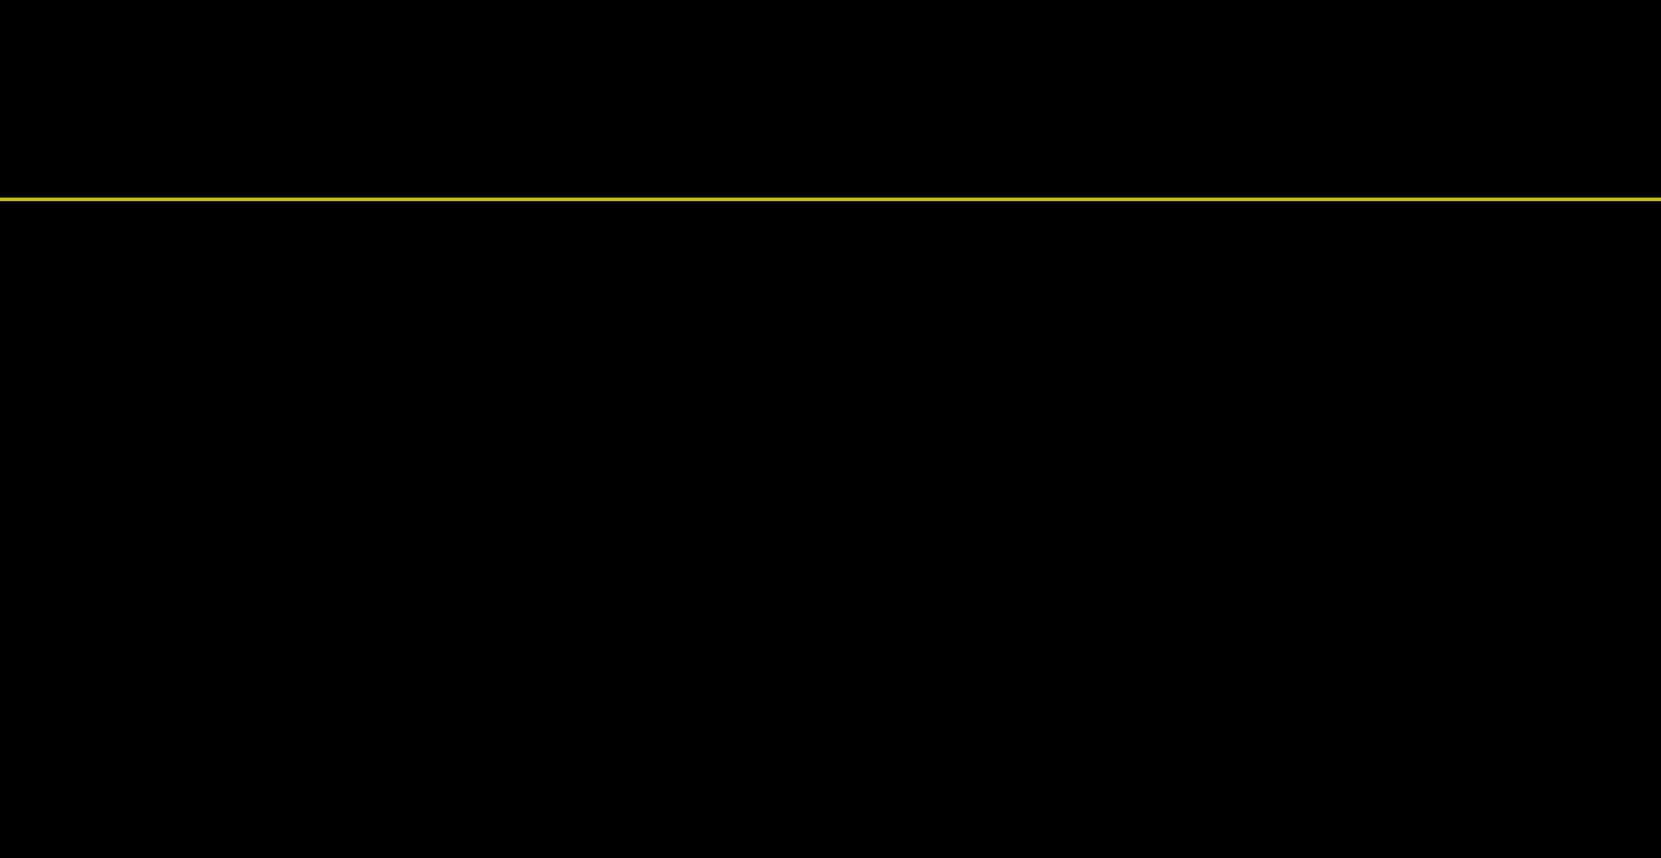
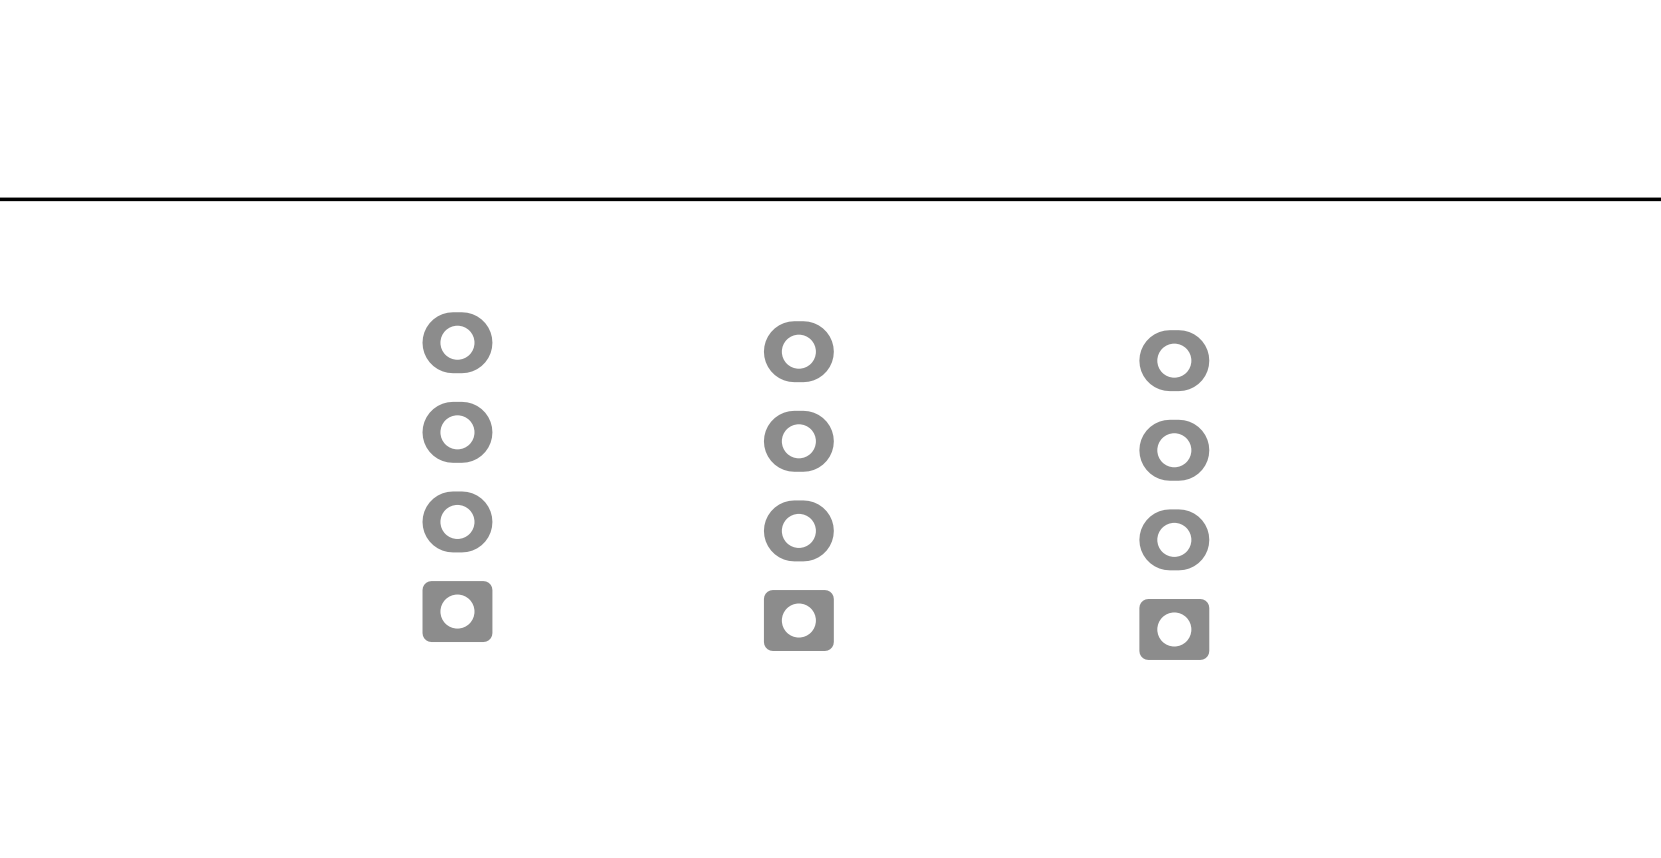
part: none -> (457, 477)
part: none -> (798, 486)
part: none -> (1174, 495)

